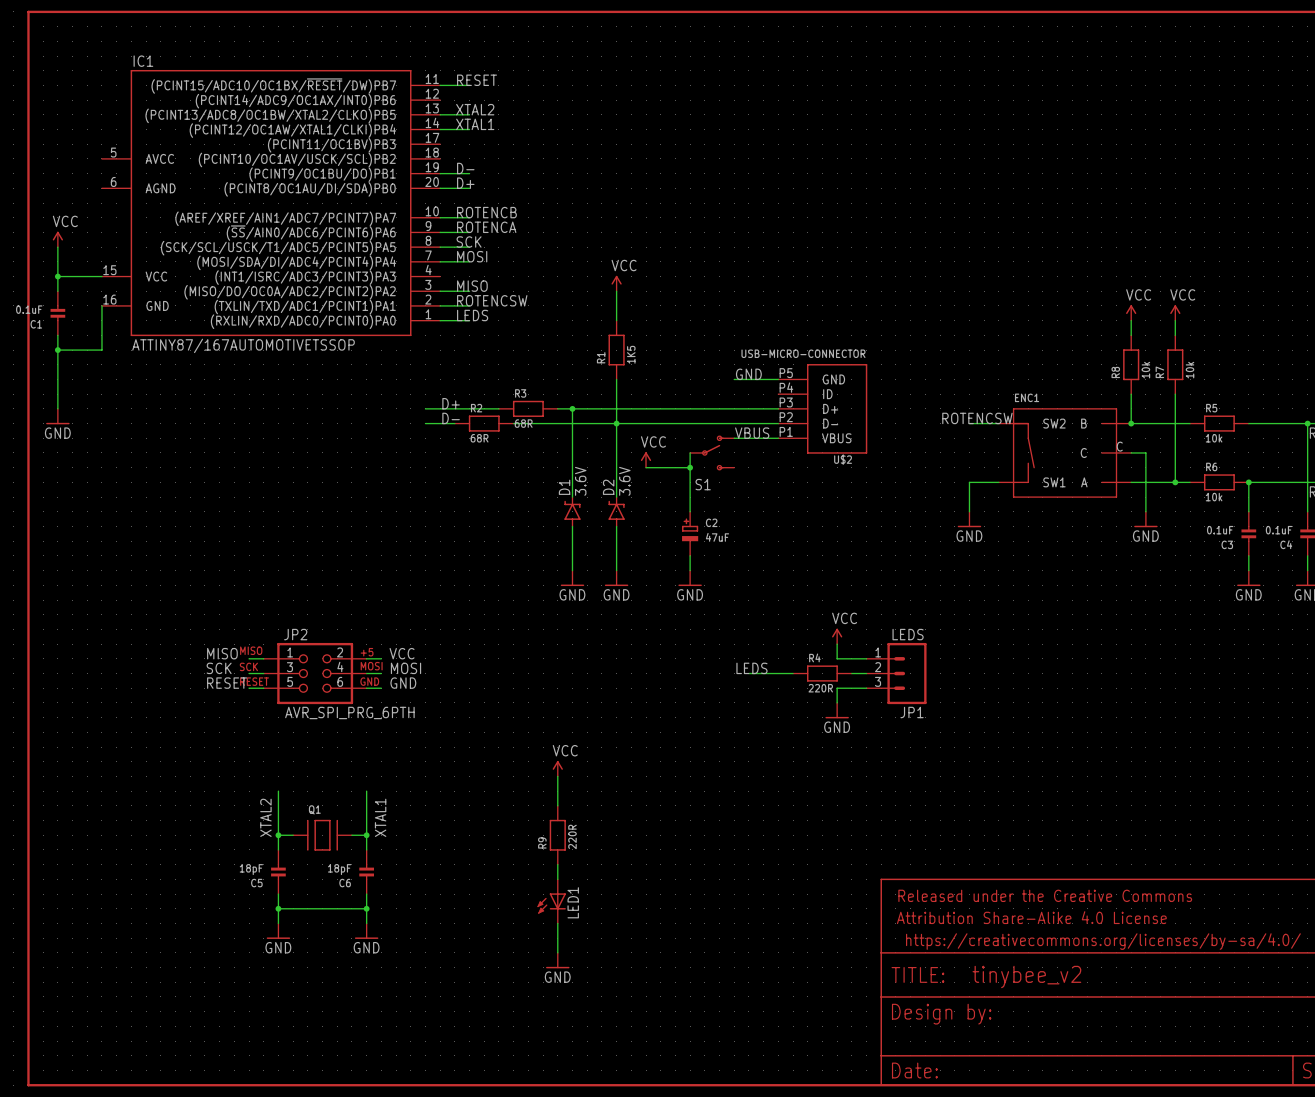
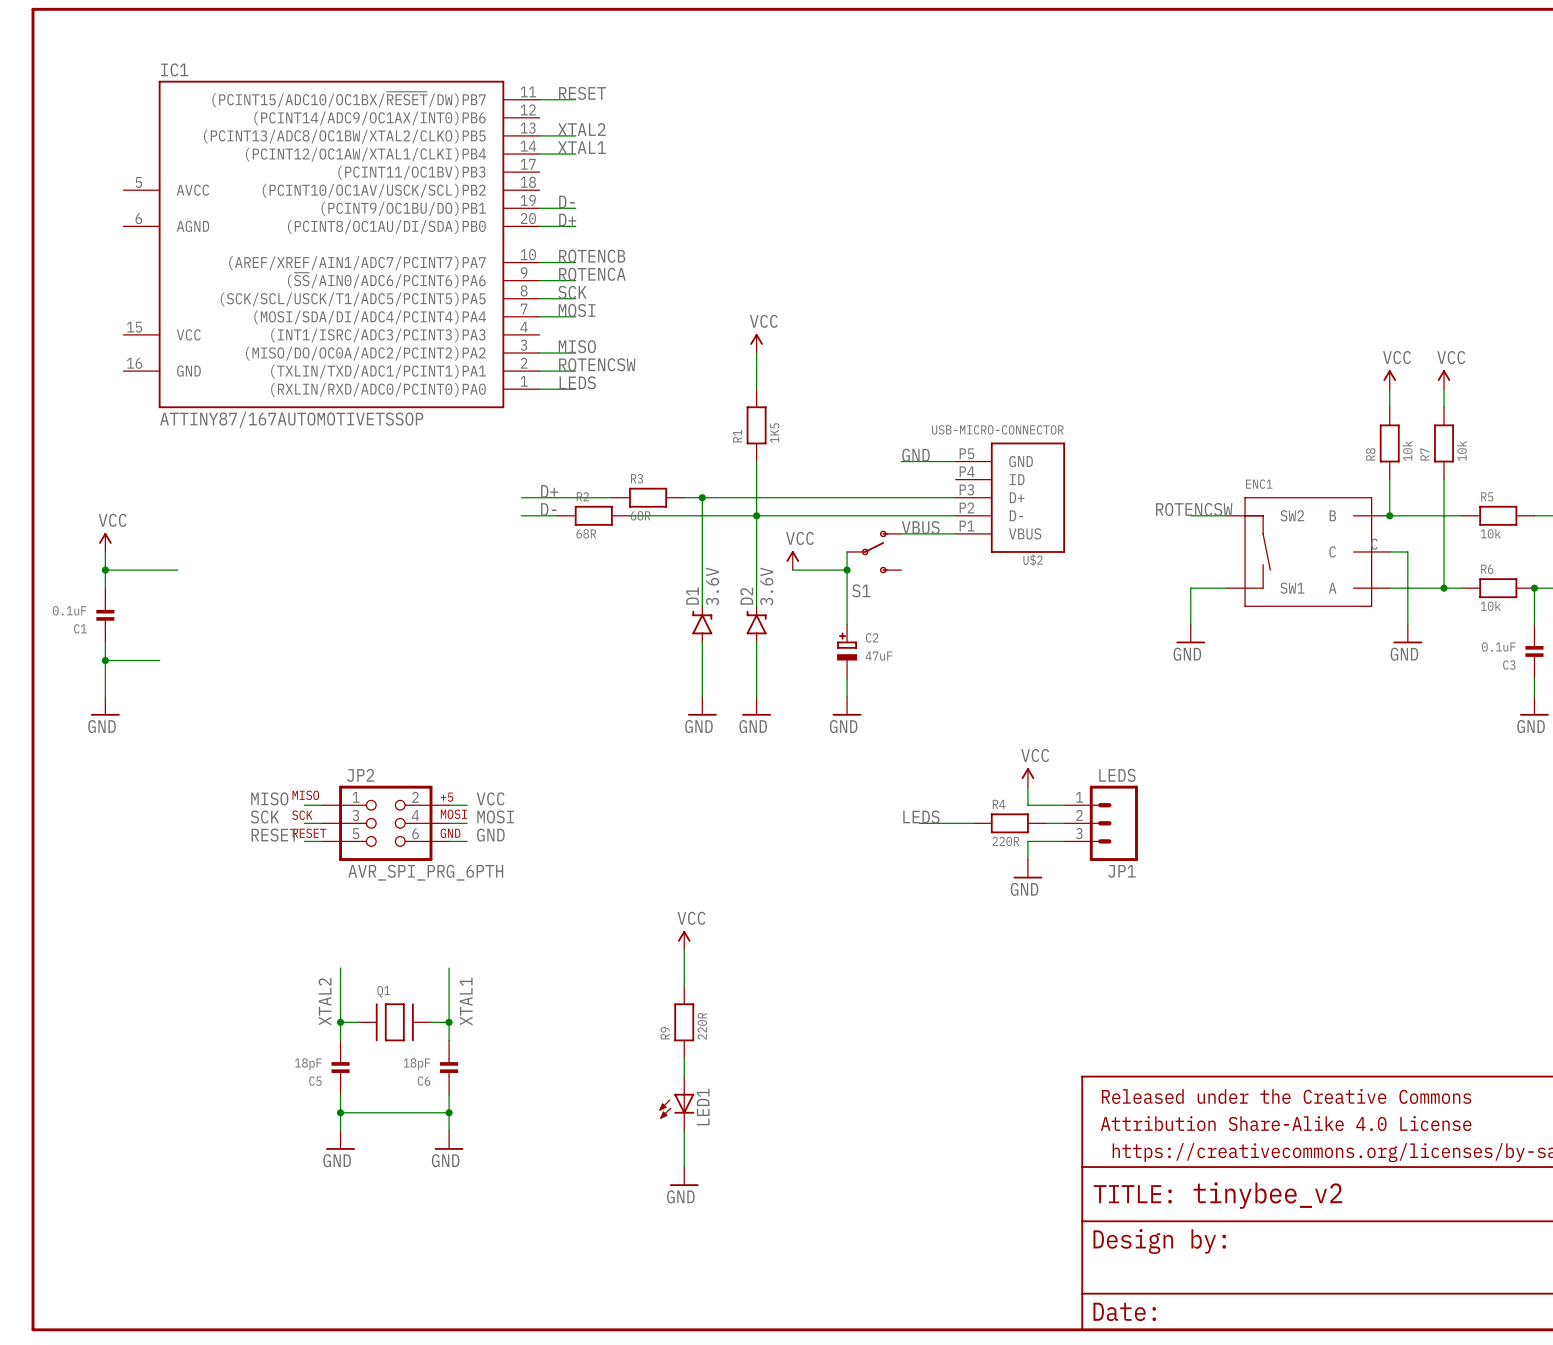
power symbol: VCC (57, 239) -> none
wire: (57, 247) (57, 291) -> none
wire: (57, 276) (101, 276) -> none
junction: (57, 276) -> none
wire: (101, 305) (101, 350) (57, 350) -> none
C1 position: (57, 313) -> (105, 615)
wire: (57, 335) (57, 408) -> none
junction: (57, 350) -> none
power symbol: GND (57, 416) -> none
power symbol: none -> VCC (105, 542)
wire: none -> (105, 551) (105, 588)
wire: none -> (105, 570) (177, 570)
junction: none -> (105, 570)
wire: none -> (105, 642) (105, 696)
wire: none -> (105, 660) (159, 660)
junction: none -> (105, 660)
power symbol: none -> GND (105, 706)

